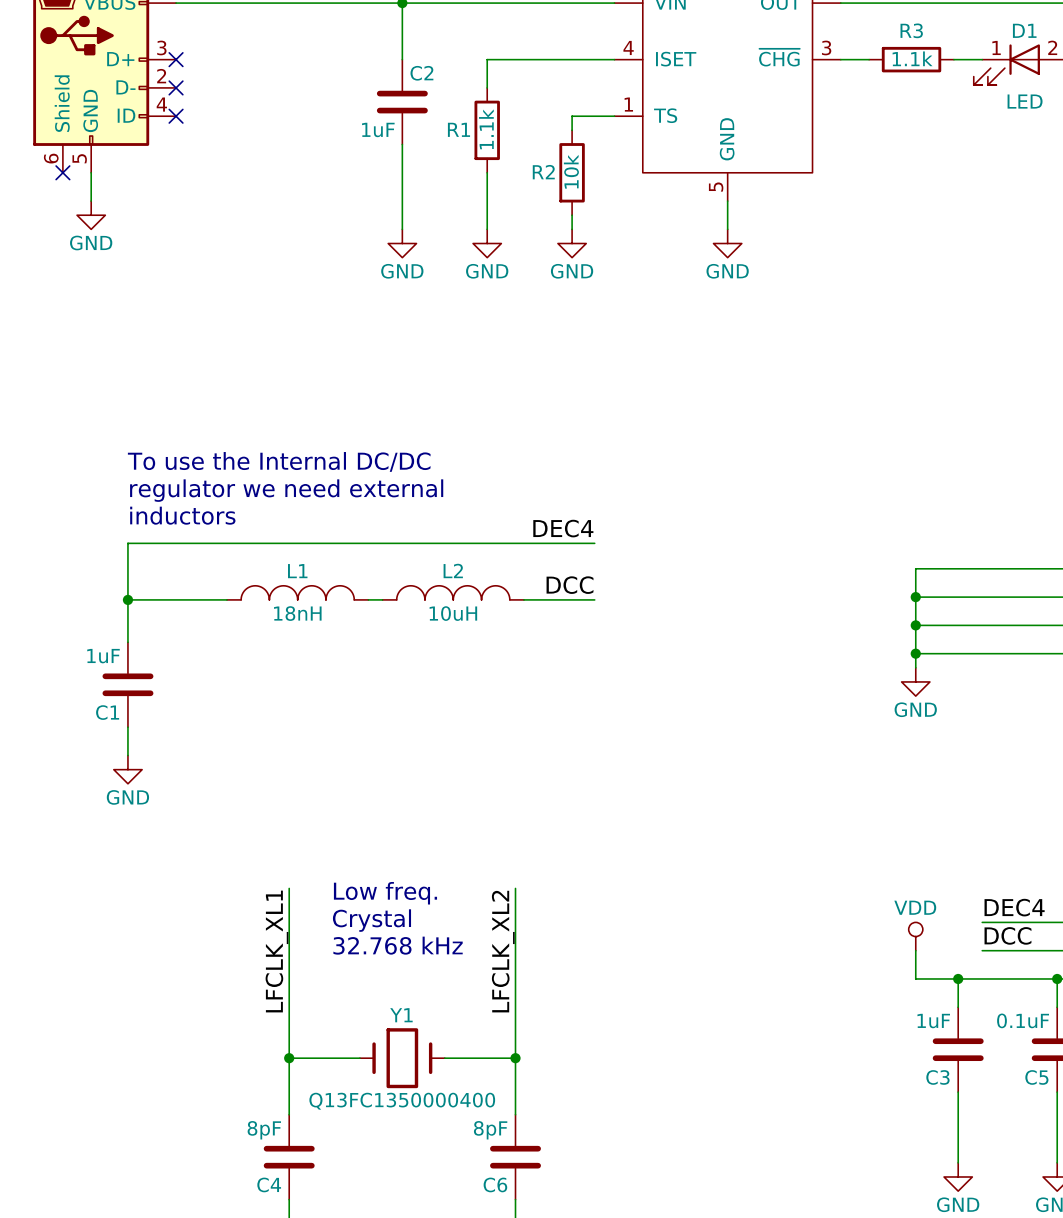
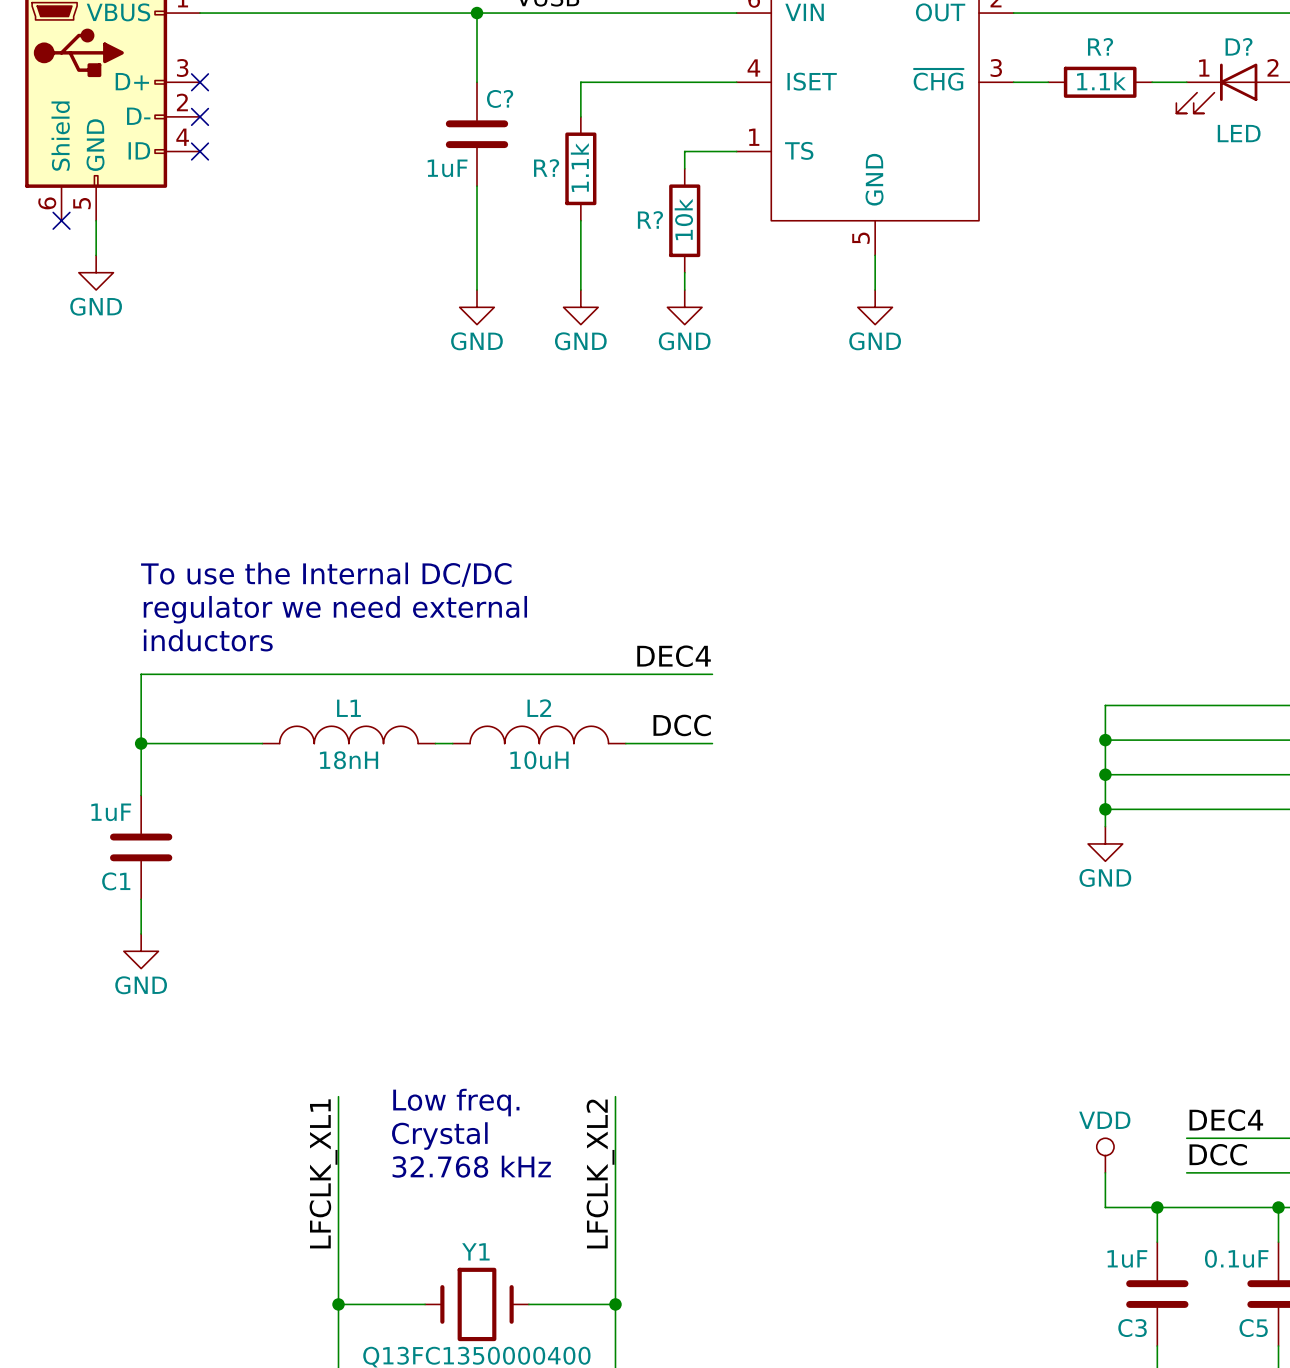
R3 name: R3 (911, 30) -> R? (1100, 46)
D1 name: D1 (1024, 30) -> D? (1239, 46)
C2 name: C2 (421, 73) -> C? (500, 98)
R1 name: R1 (458, 129) -> R? (546, 168)
R2 name: R2 (543, 172) -> R? (650, 219)

